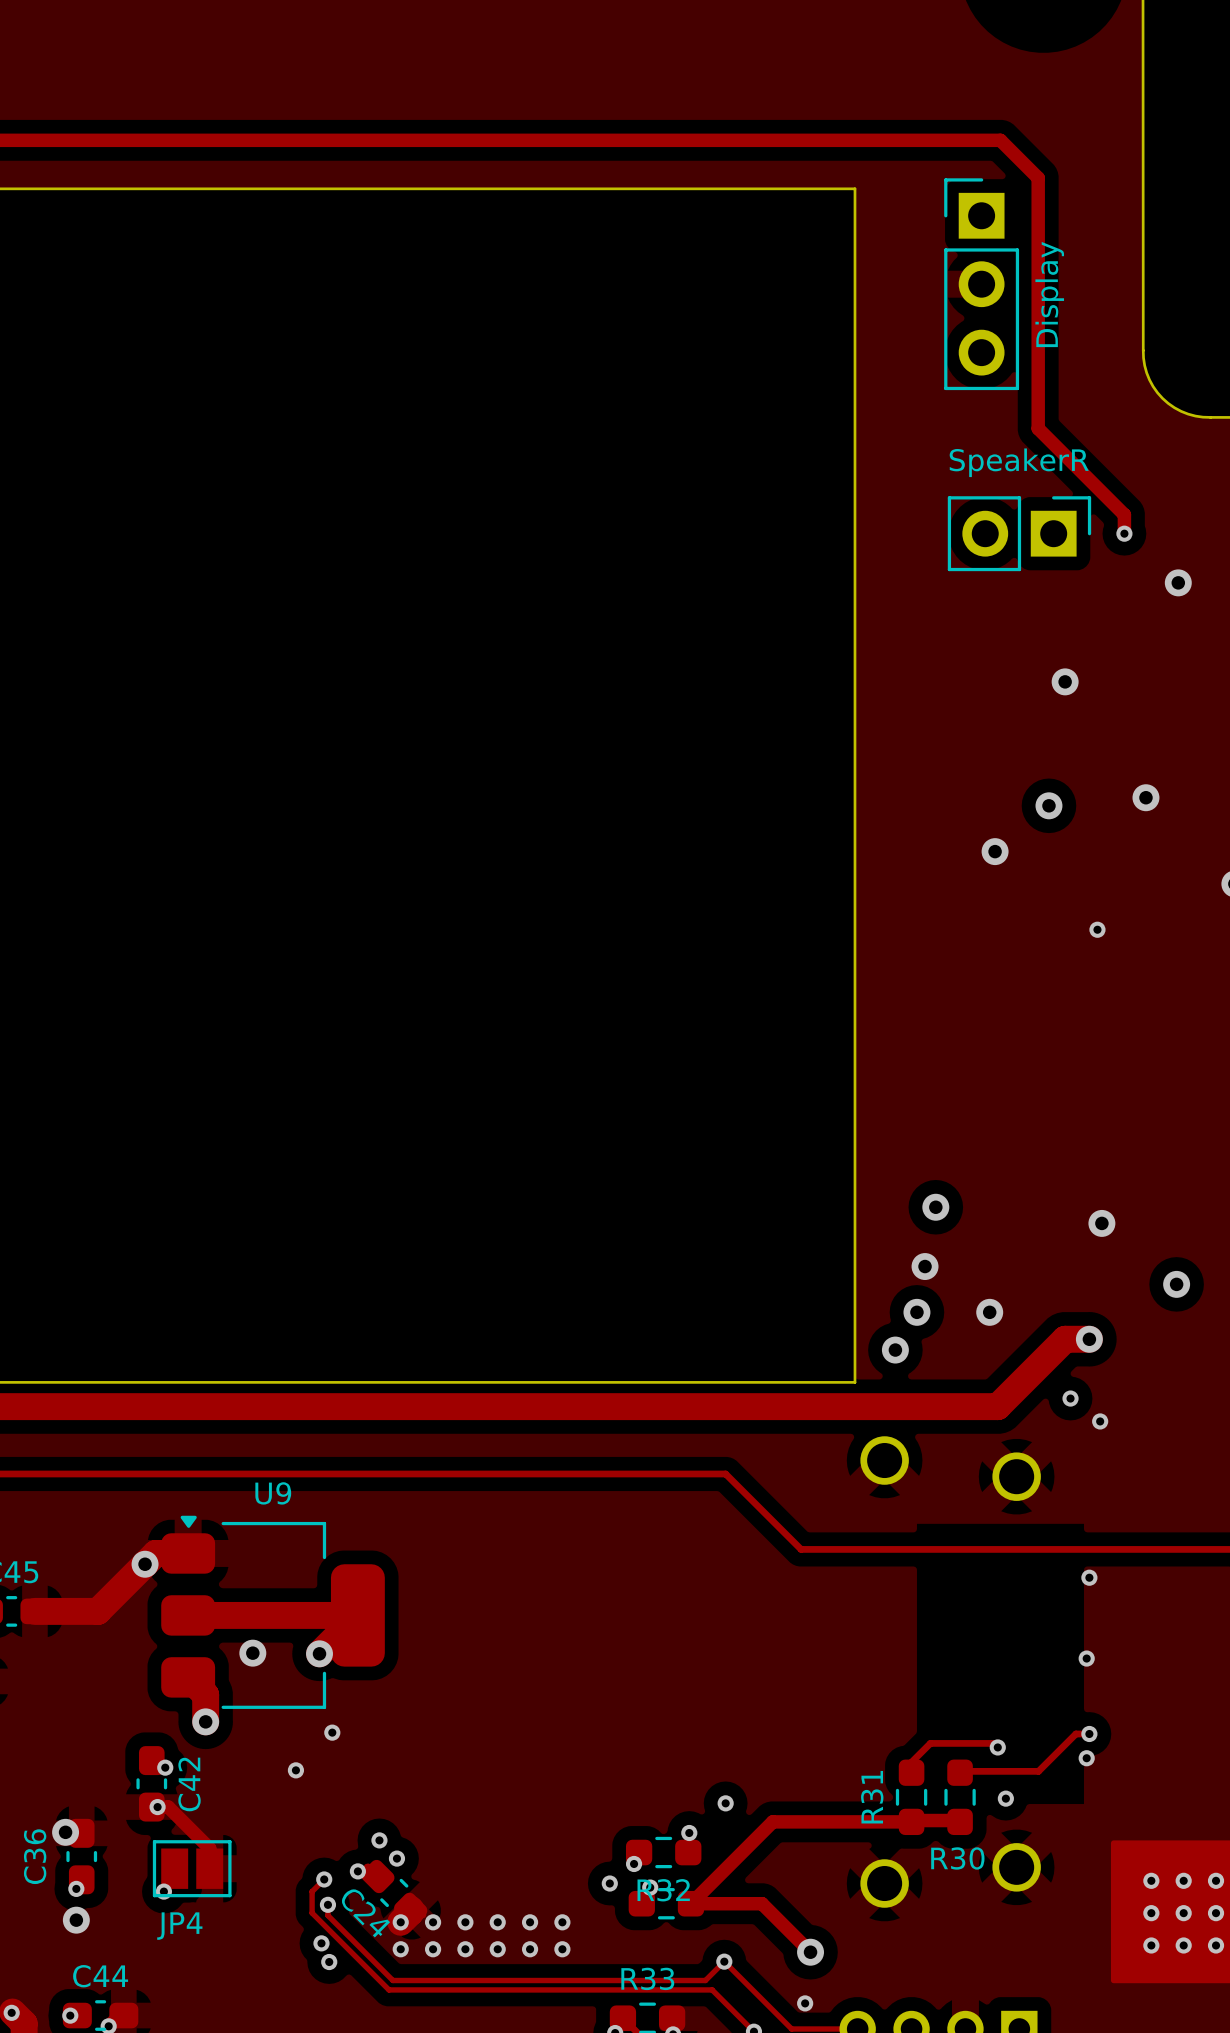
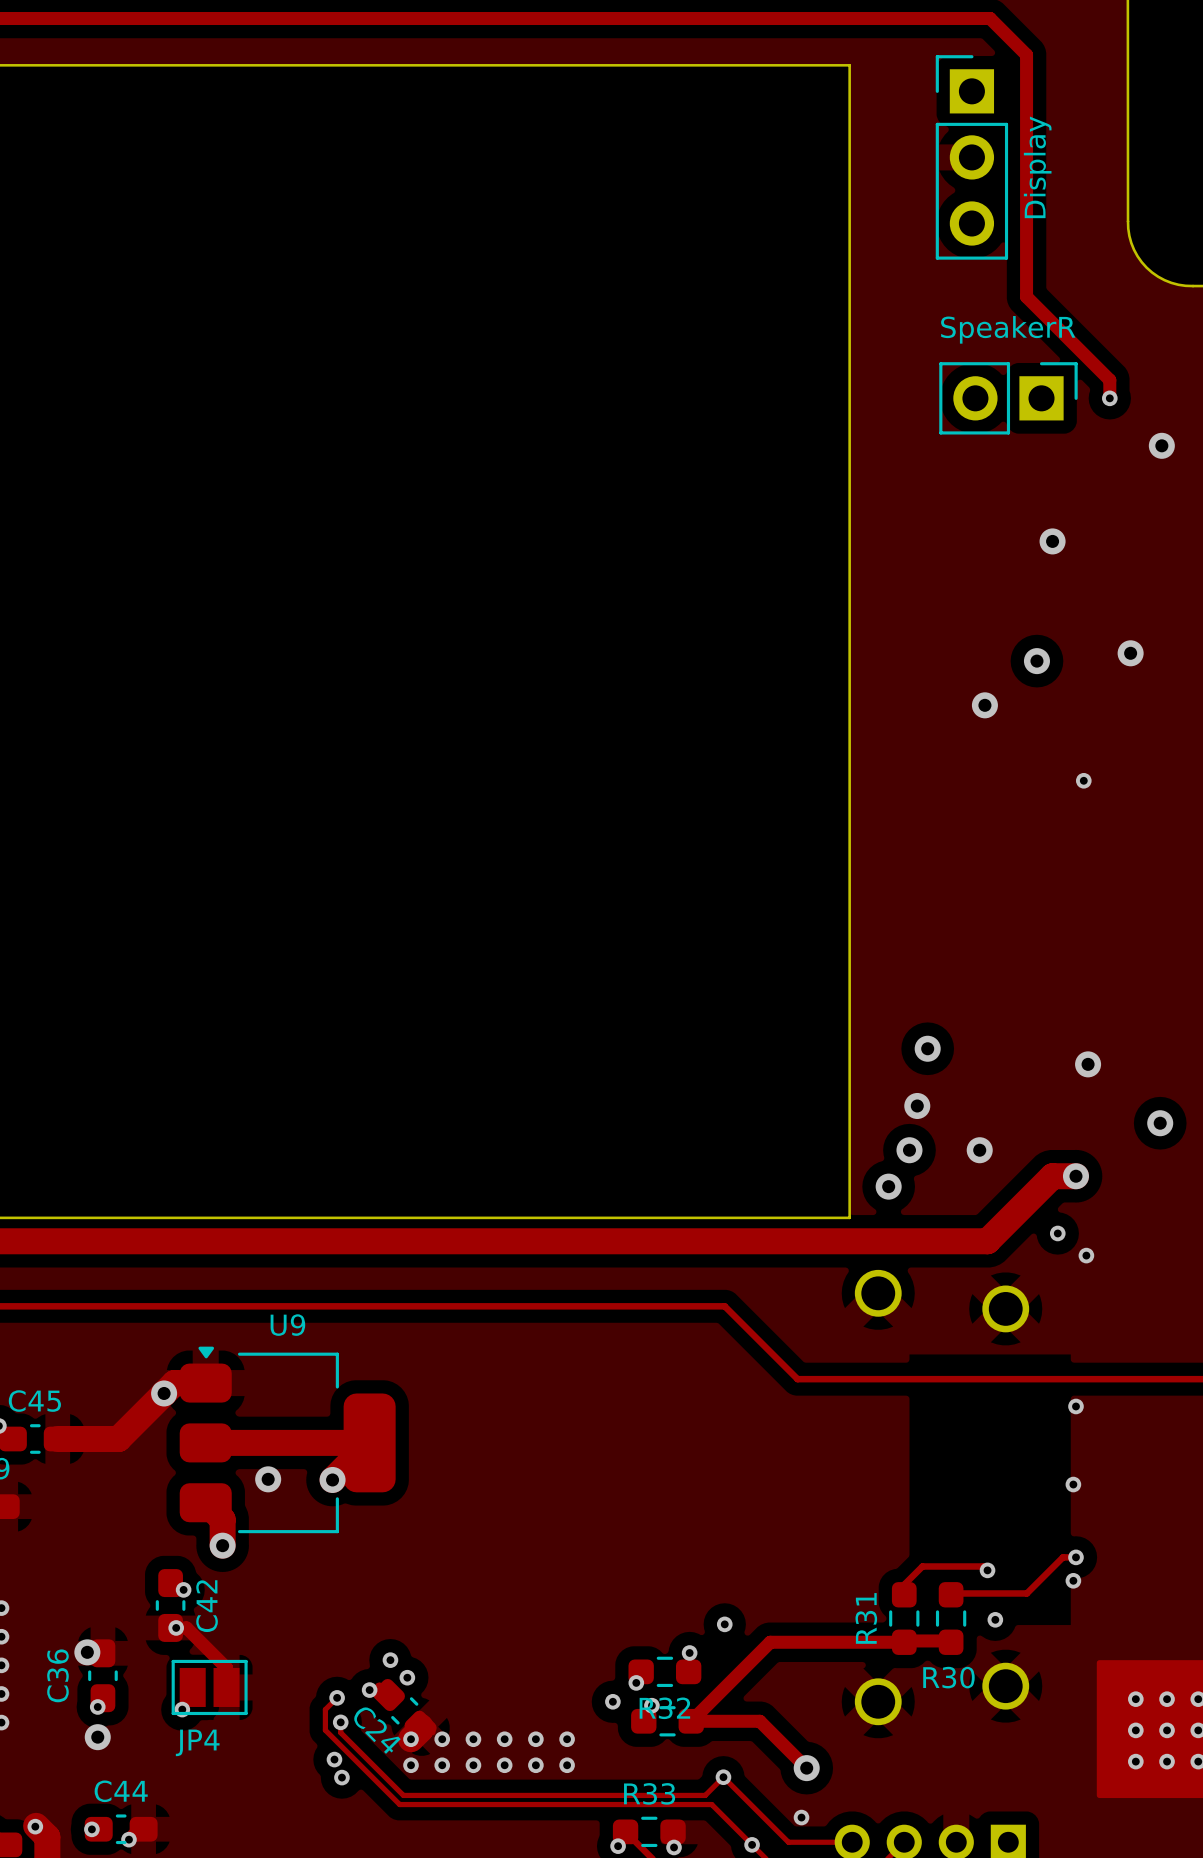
via: (332, 1732) -> none
via: (295, 1770) -> none

